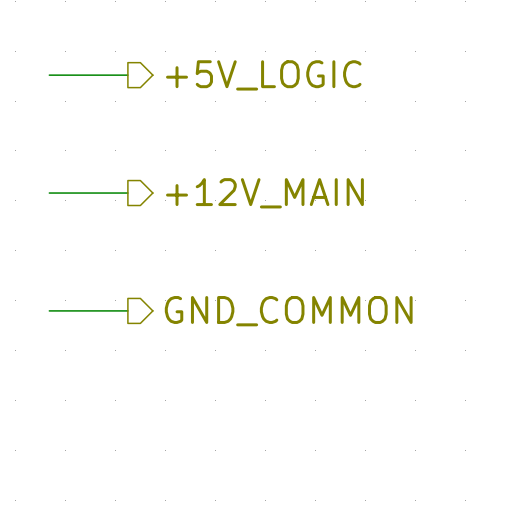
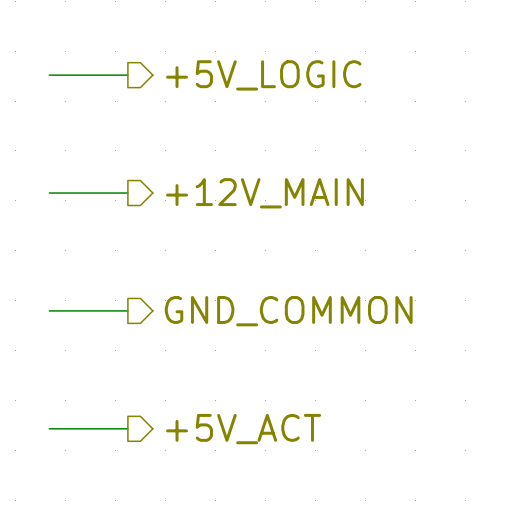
wire: none -> (49, 428) (127, 428)
hierarchical label: none -> +5V_ACT (243, 429)

